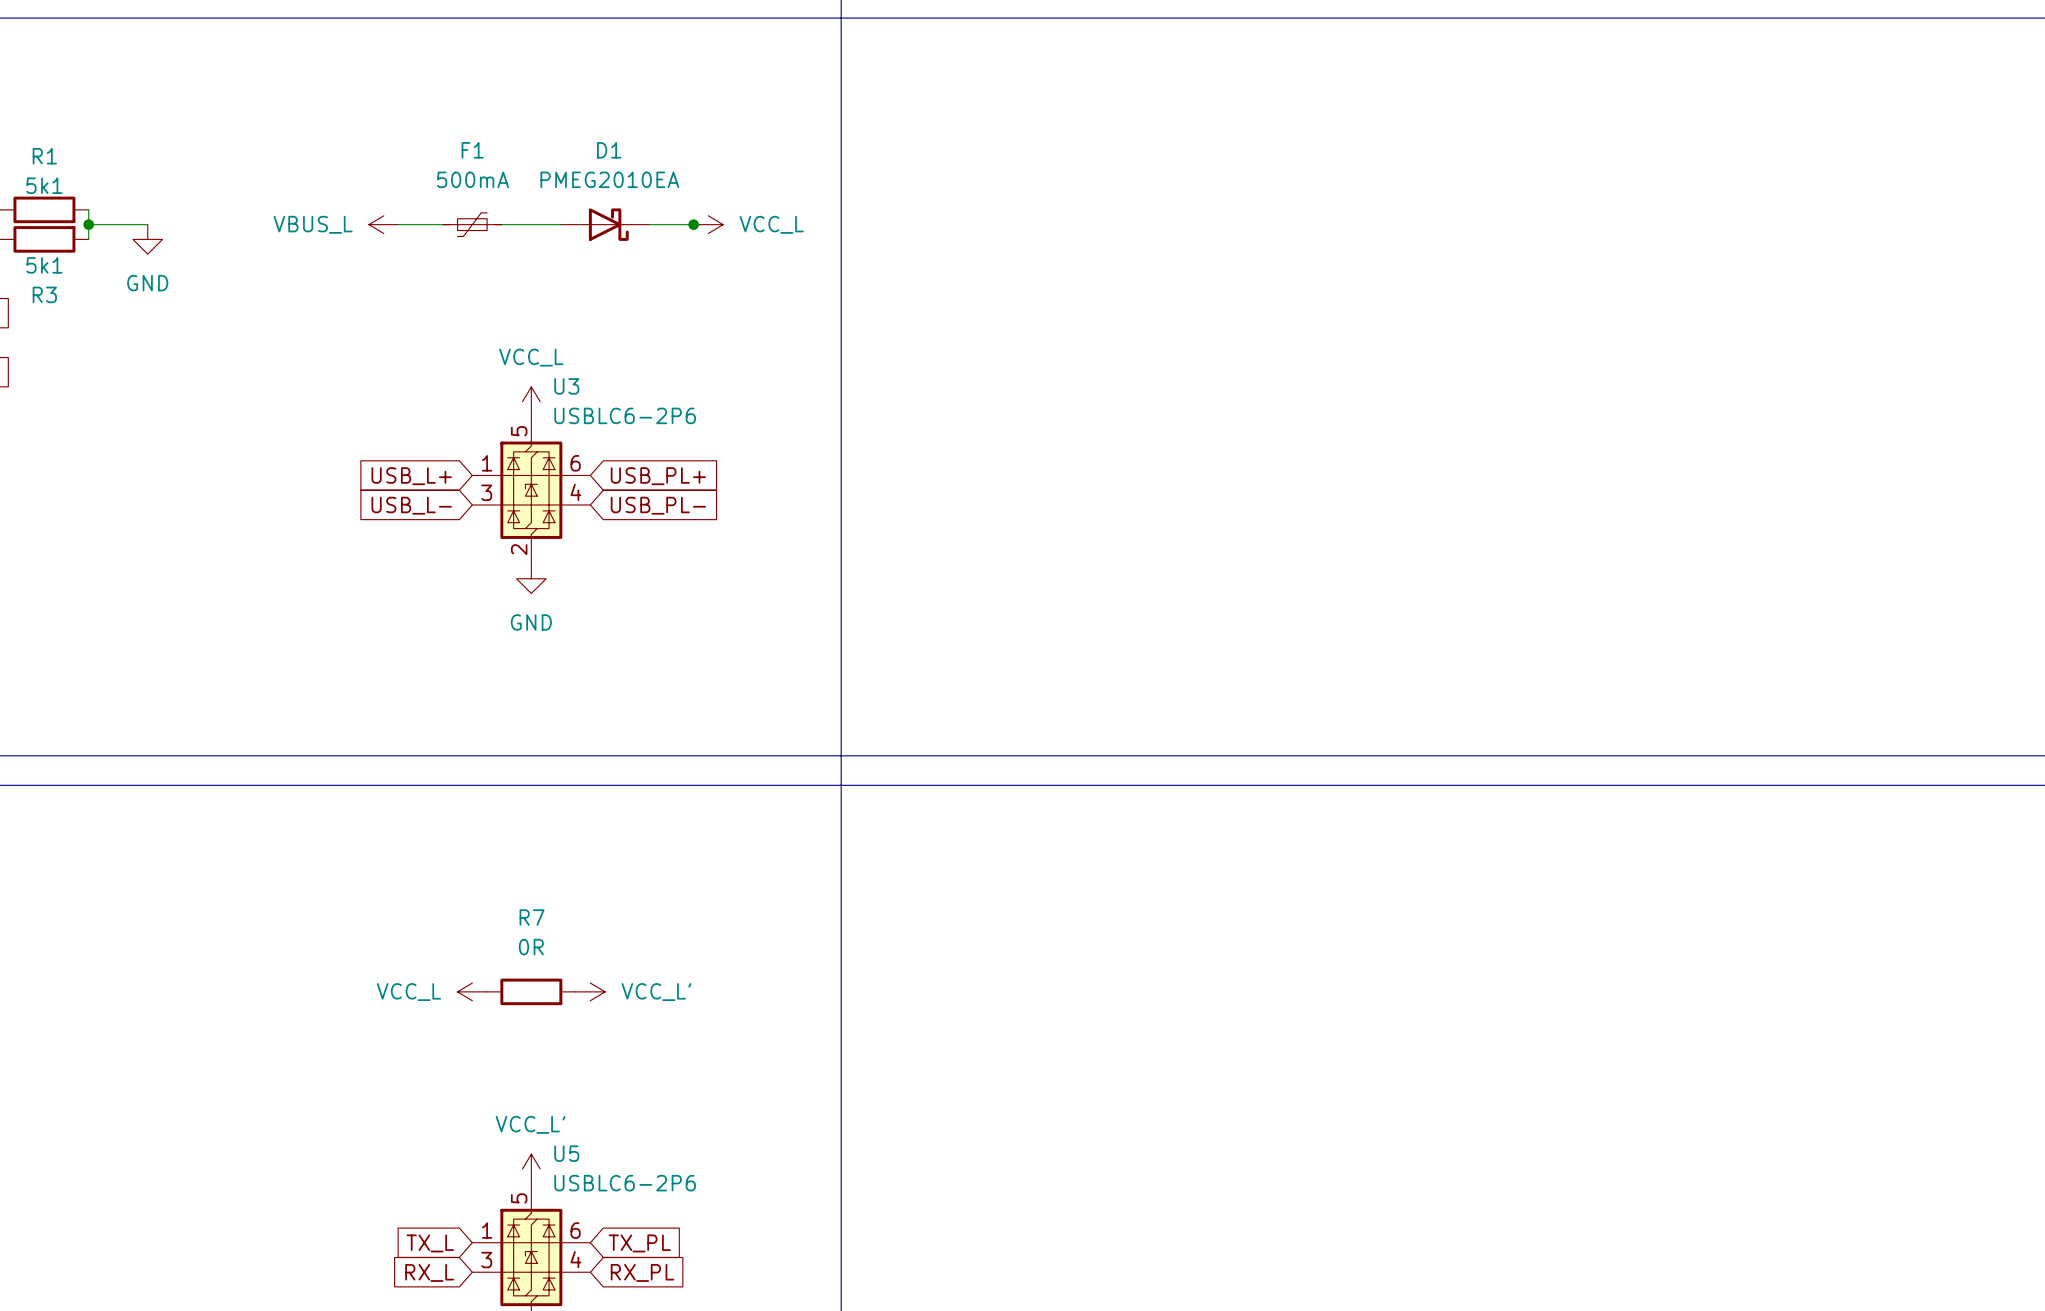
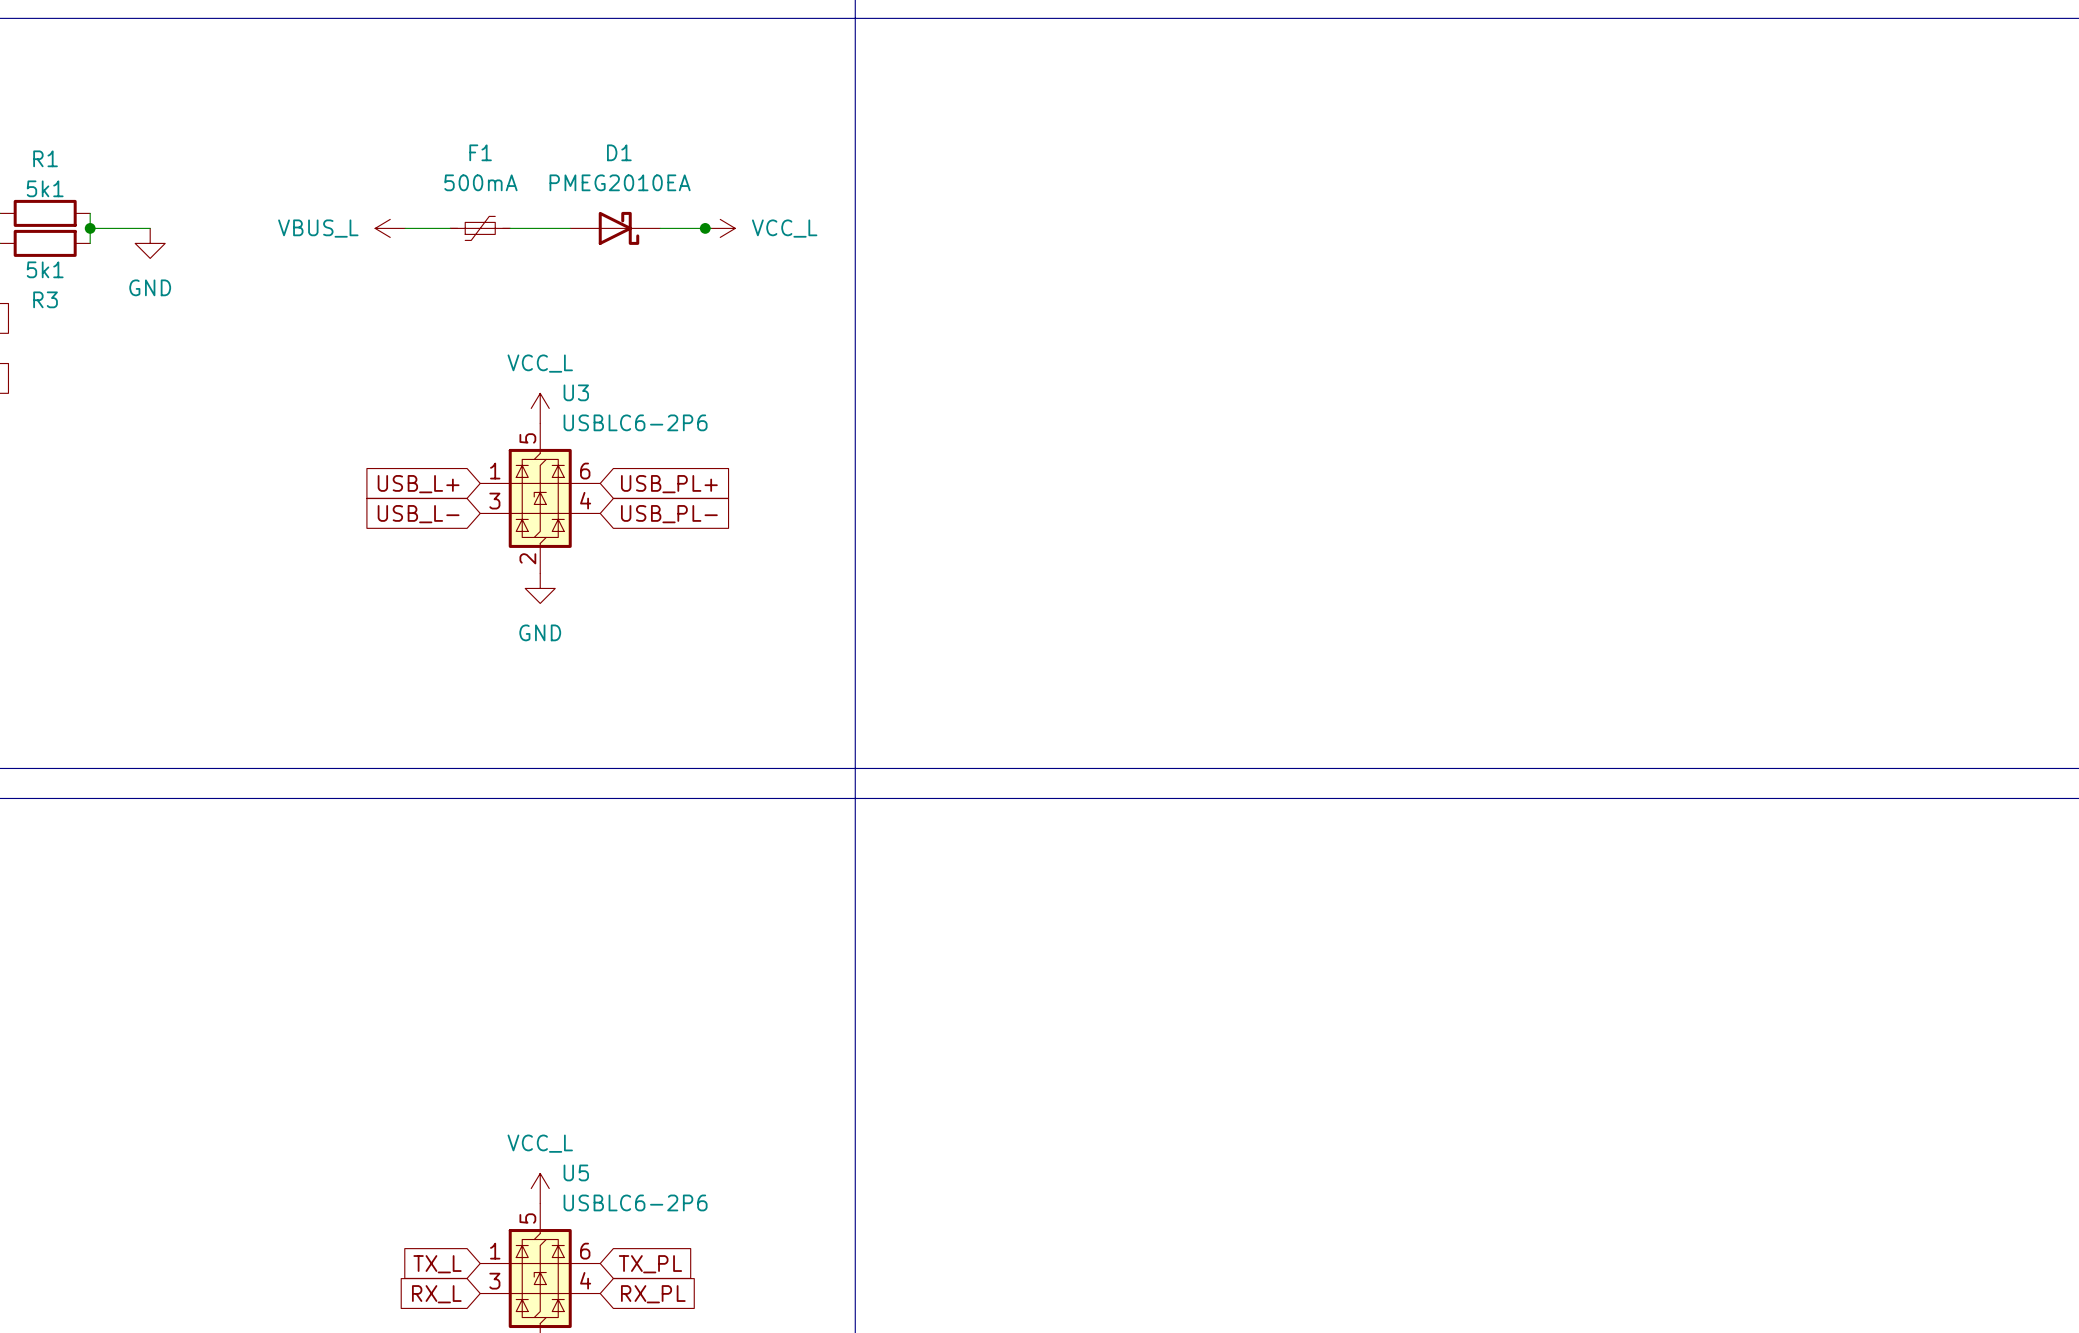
power symbol: VCC_L (472, 991) -> none
R7: 0R (531, 991) -> none
power symbol: VCC_L' (590, 991) -> none
power symbol: VCC_L' (531, 1168) -> VCC_L (540, 1188)

